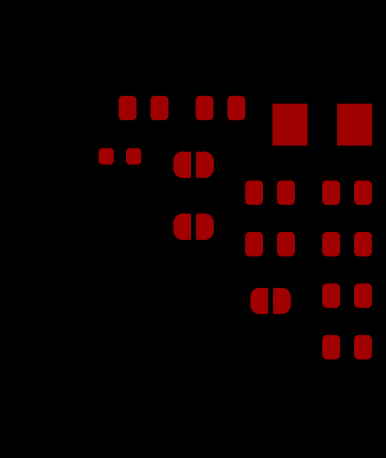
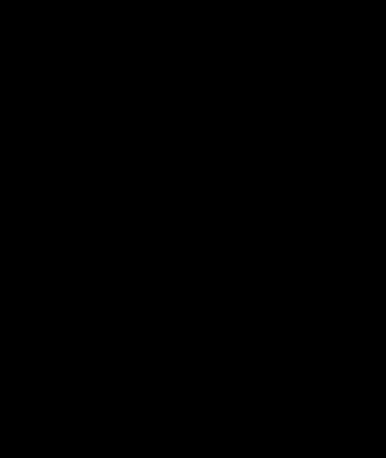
part: (143, 108) -> none
part: (220, 108) -> none
part: (322, 124) -> none
part: (119, 156) -> none
part: (193, 164) -> none
part: (270, 192) -> none
part: (347, 192) -> none
part: (193, 226) -> none
part: (270, 244) -> none
part: (347, 244) -> none
part: (347, 295) -> none
part: (270, 300) -> none
part: (347, 347) -> none

